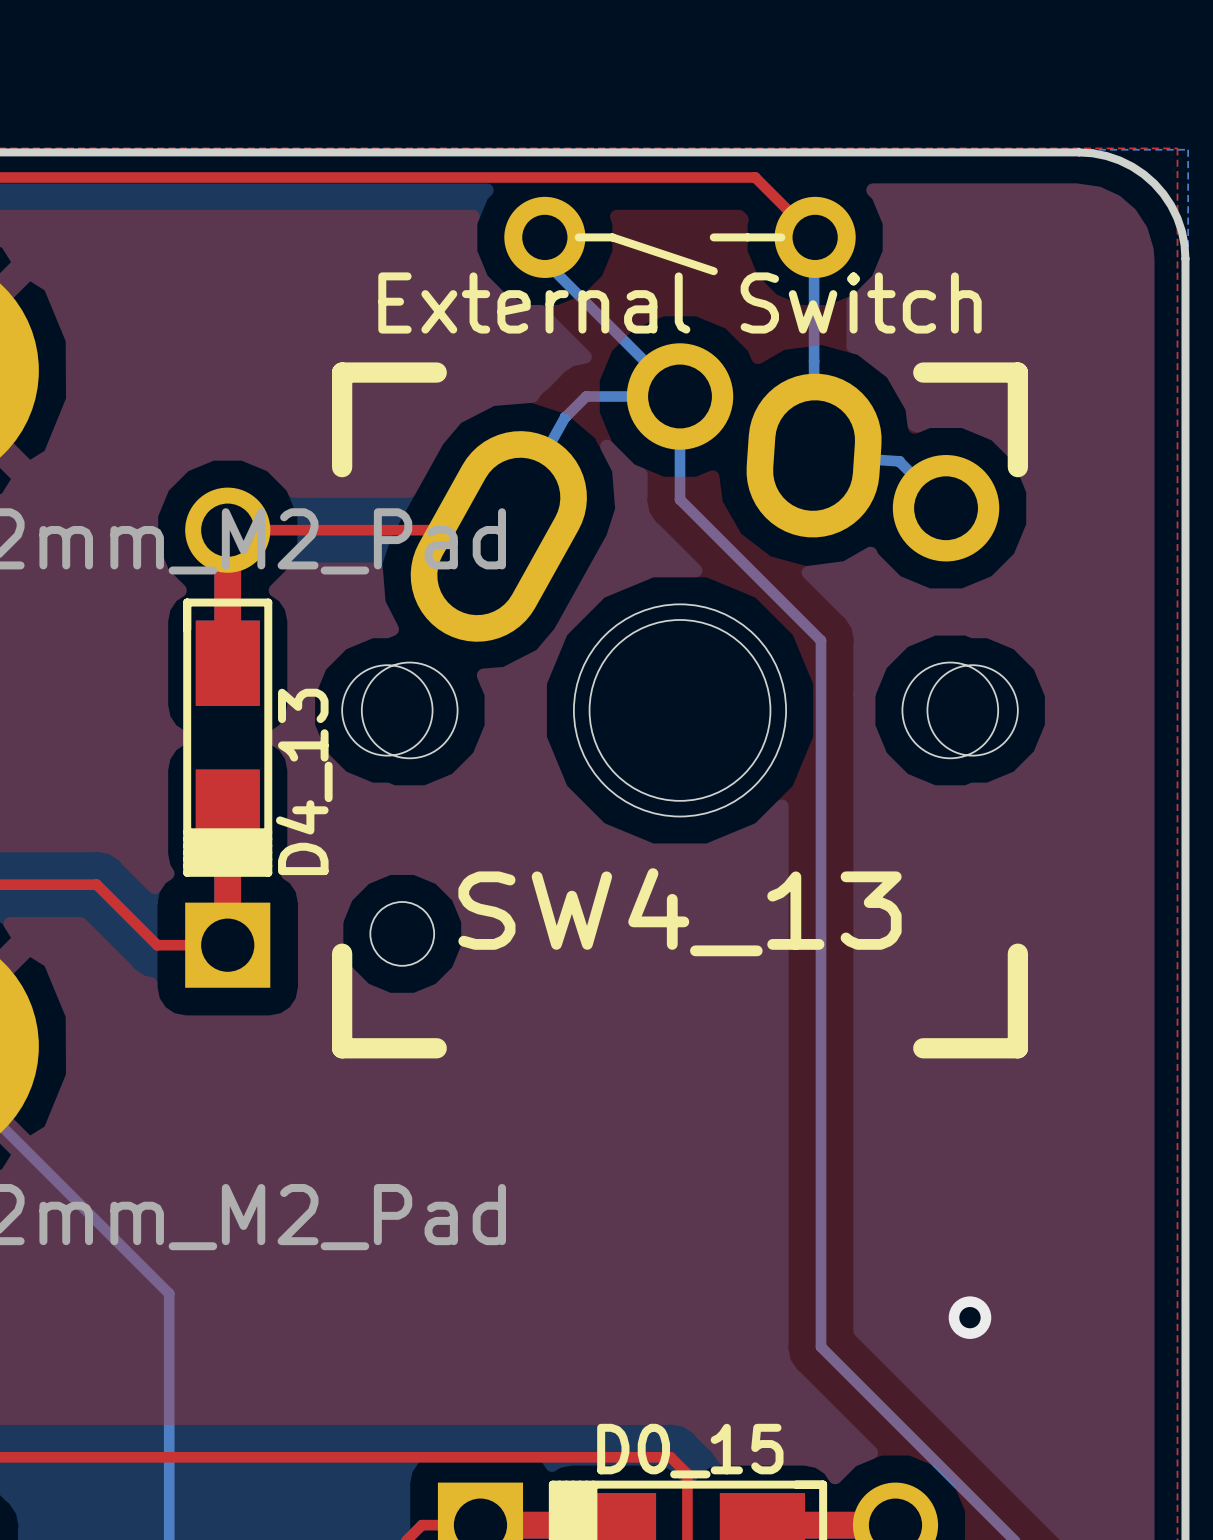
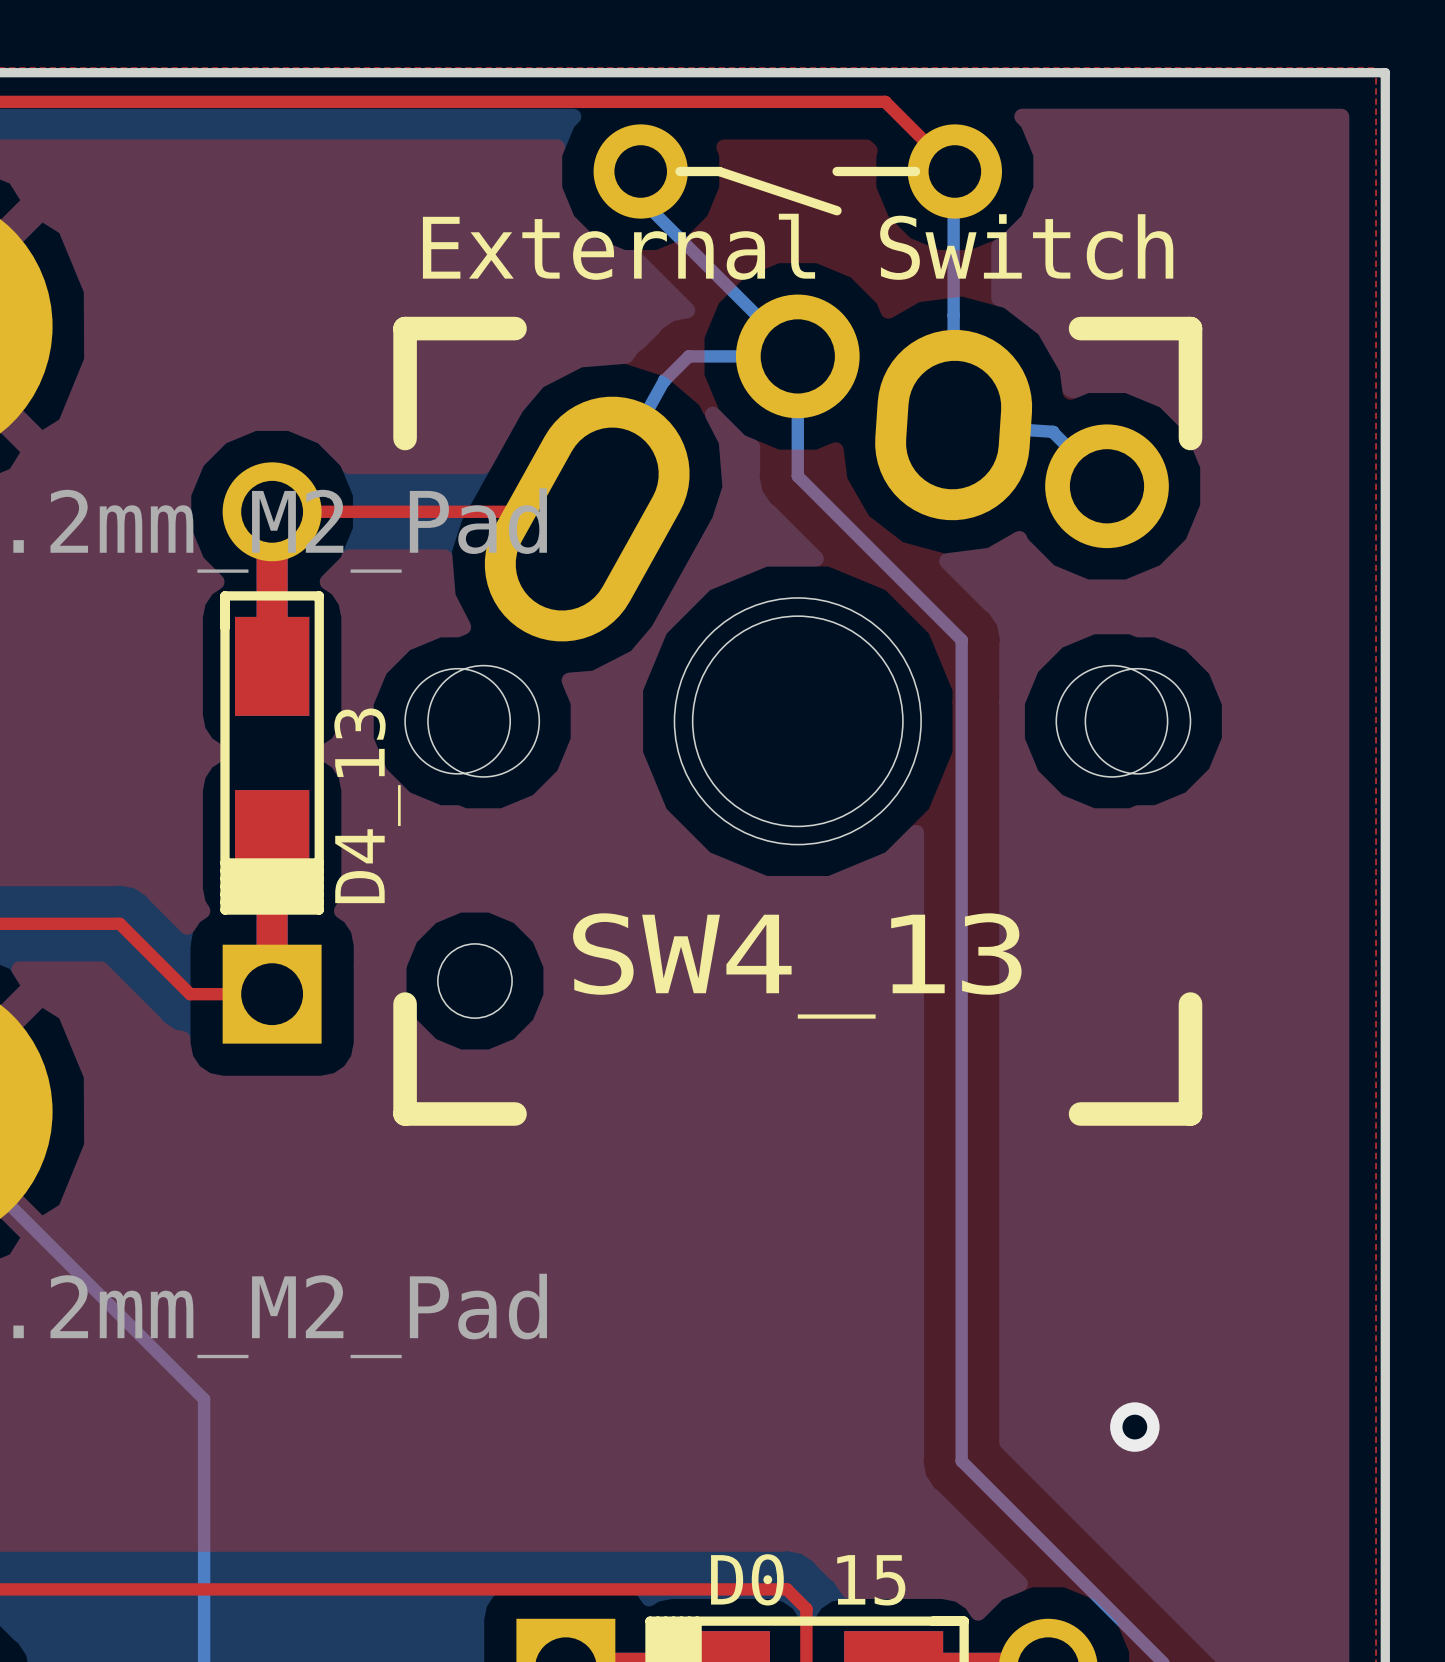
board edge: (1079, 152) (1092, 153) (1119, 160) (1143, 174) (1154, 183) (1171, 205) (1177, 218) (1184, 244) (1185, 258) -> (1261, 72) (1385, 72) (1385, 196)

